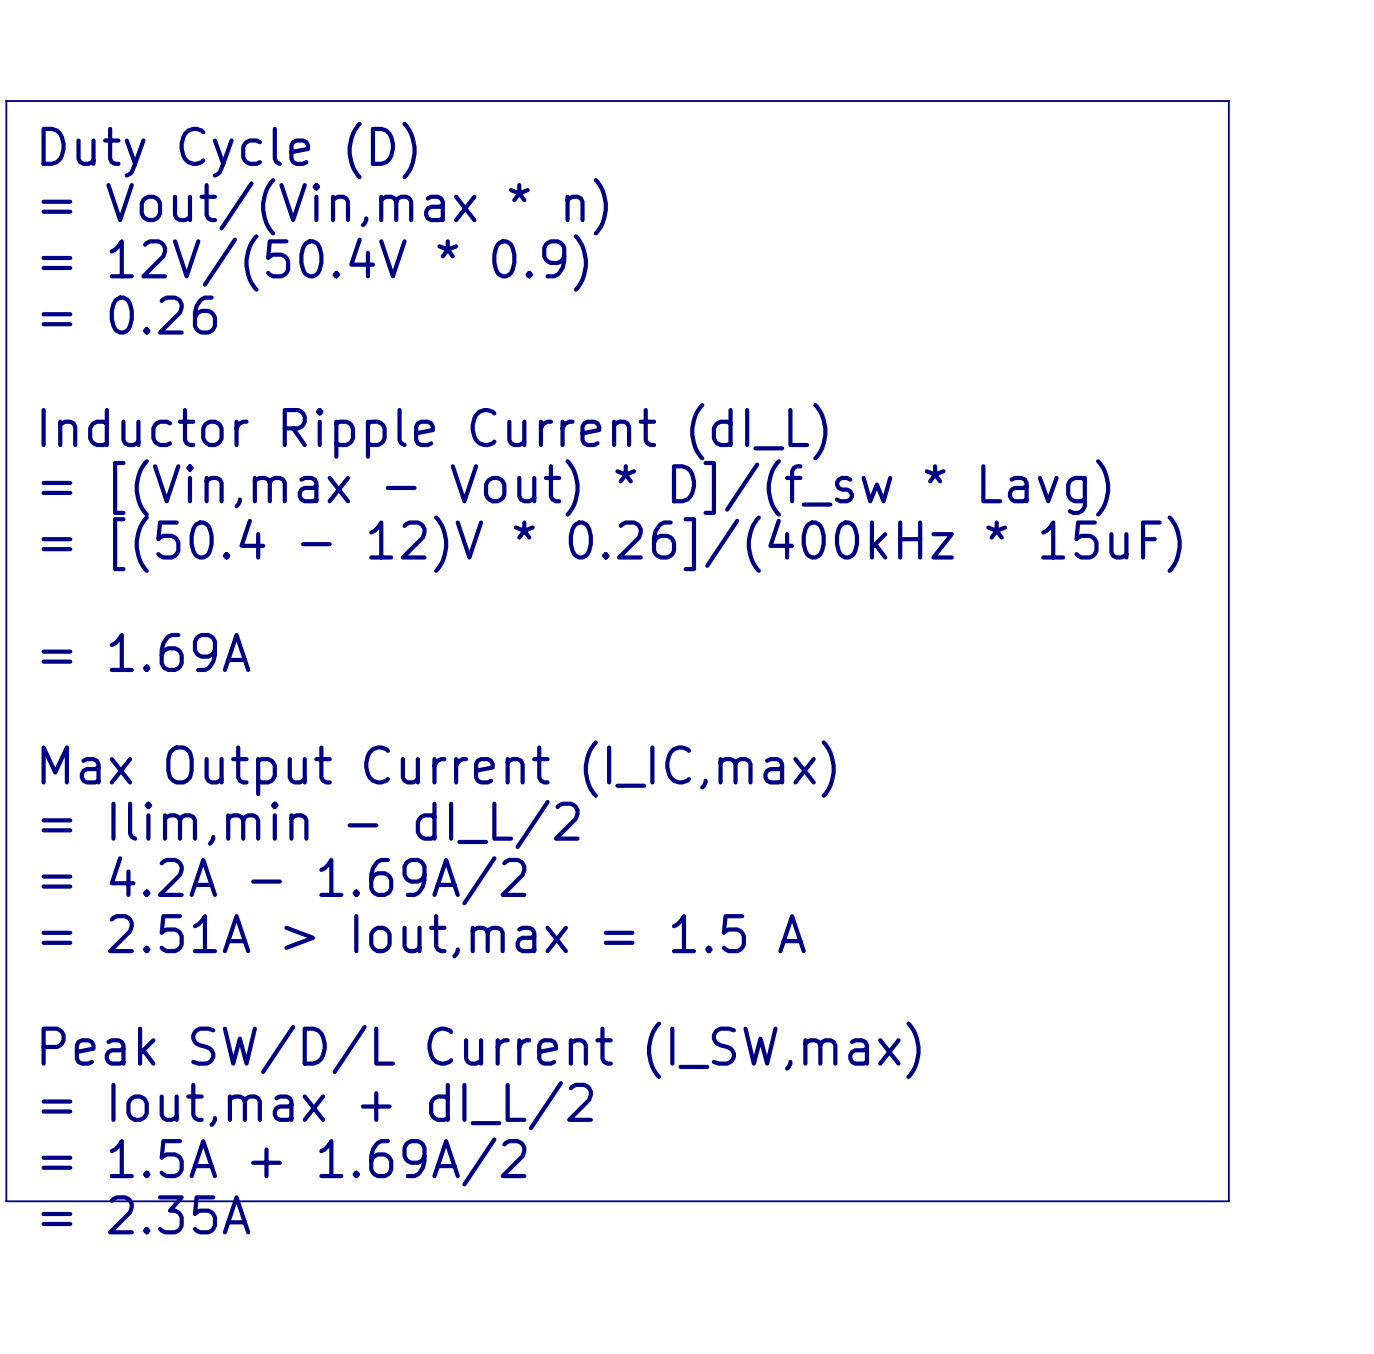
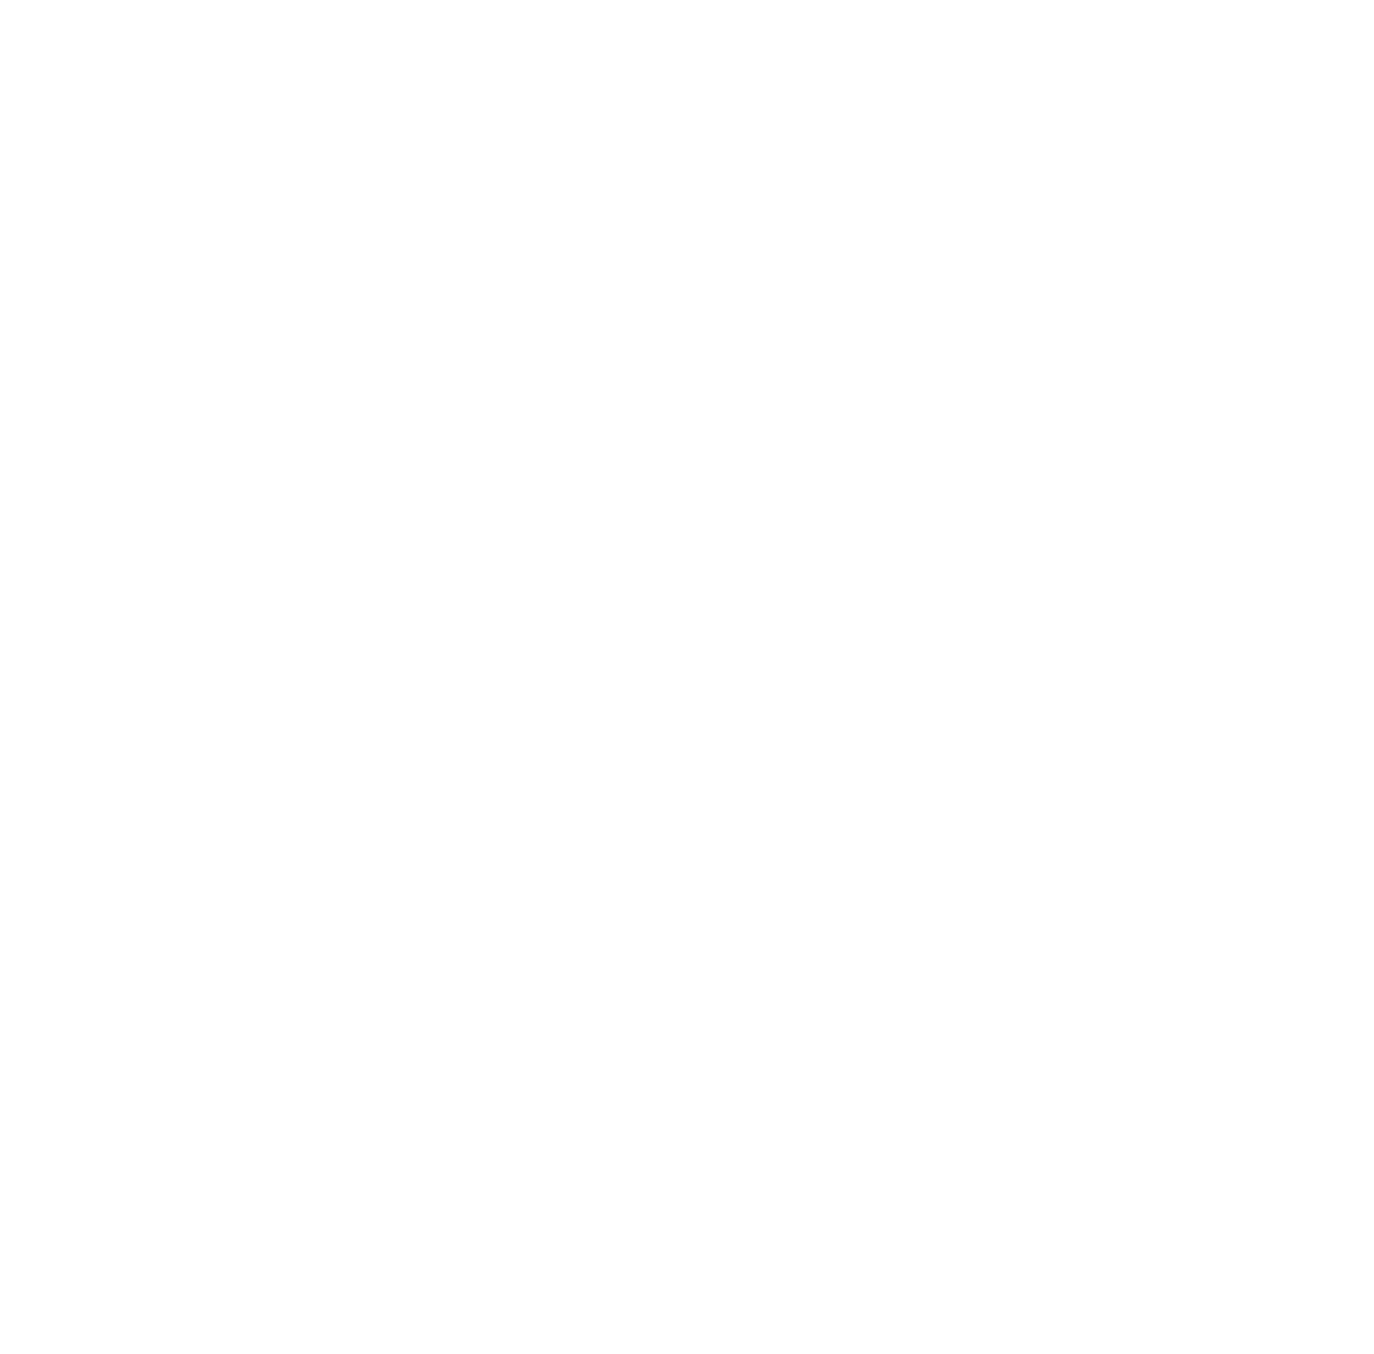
line: (6, 101) (1228, 101) (1228, 1201) (6, 1201) (6, 101) -> none
text: Duty Cycle (D) (229, 150) -> none
text: = Vout/(Vin,max * n) (324, 206) -> none
text: = 12V/(50.4V * 0.9) (314, 262) -> none
text: = 0.26 (129, 315) -> none
text: Inductor Ripple Current (dI_L) (434, 431) -> none
text: = [(Vin,max - Vout) * D]/(f_sw * Lavg) (575, 487) -> none
text: = [(50.4 - 12)V * 0.26]/(400kHz * 15uF) (611, 544) -> none
text: = 1.69A (145, 652) -> none
text: Max Output Current (I_IC,max) (438, 769) -> none
text: = Ilim,min - dI_L/2 (310, 824) -> none
text: = 4.2A - 1.69A/2 (283, 880) -> none
text: = 2.51A > Iout,max = 1.5 A (423, 936) -> none
text: Peak SW/D/L Current (I_SW,max) (481, 1050) -> none
text: = Iout,max + dI_L/2 (317, 1105) -> none
text: = 1.5A + 1.69A/2 (283, 1161) -> none
text: = 2.35A (145, 1214) -> none

